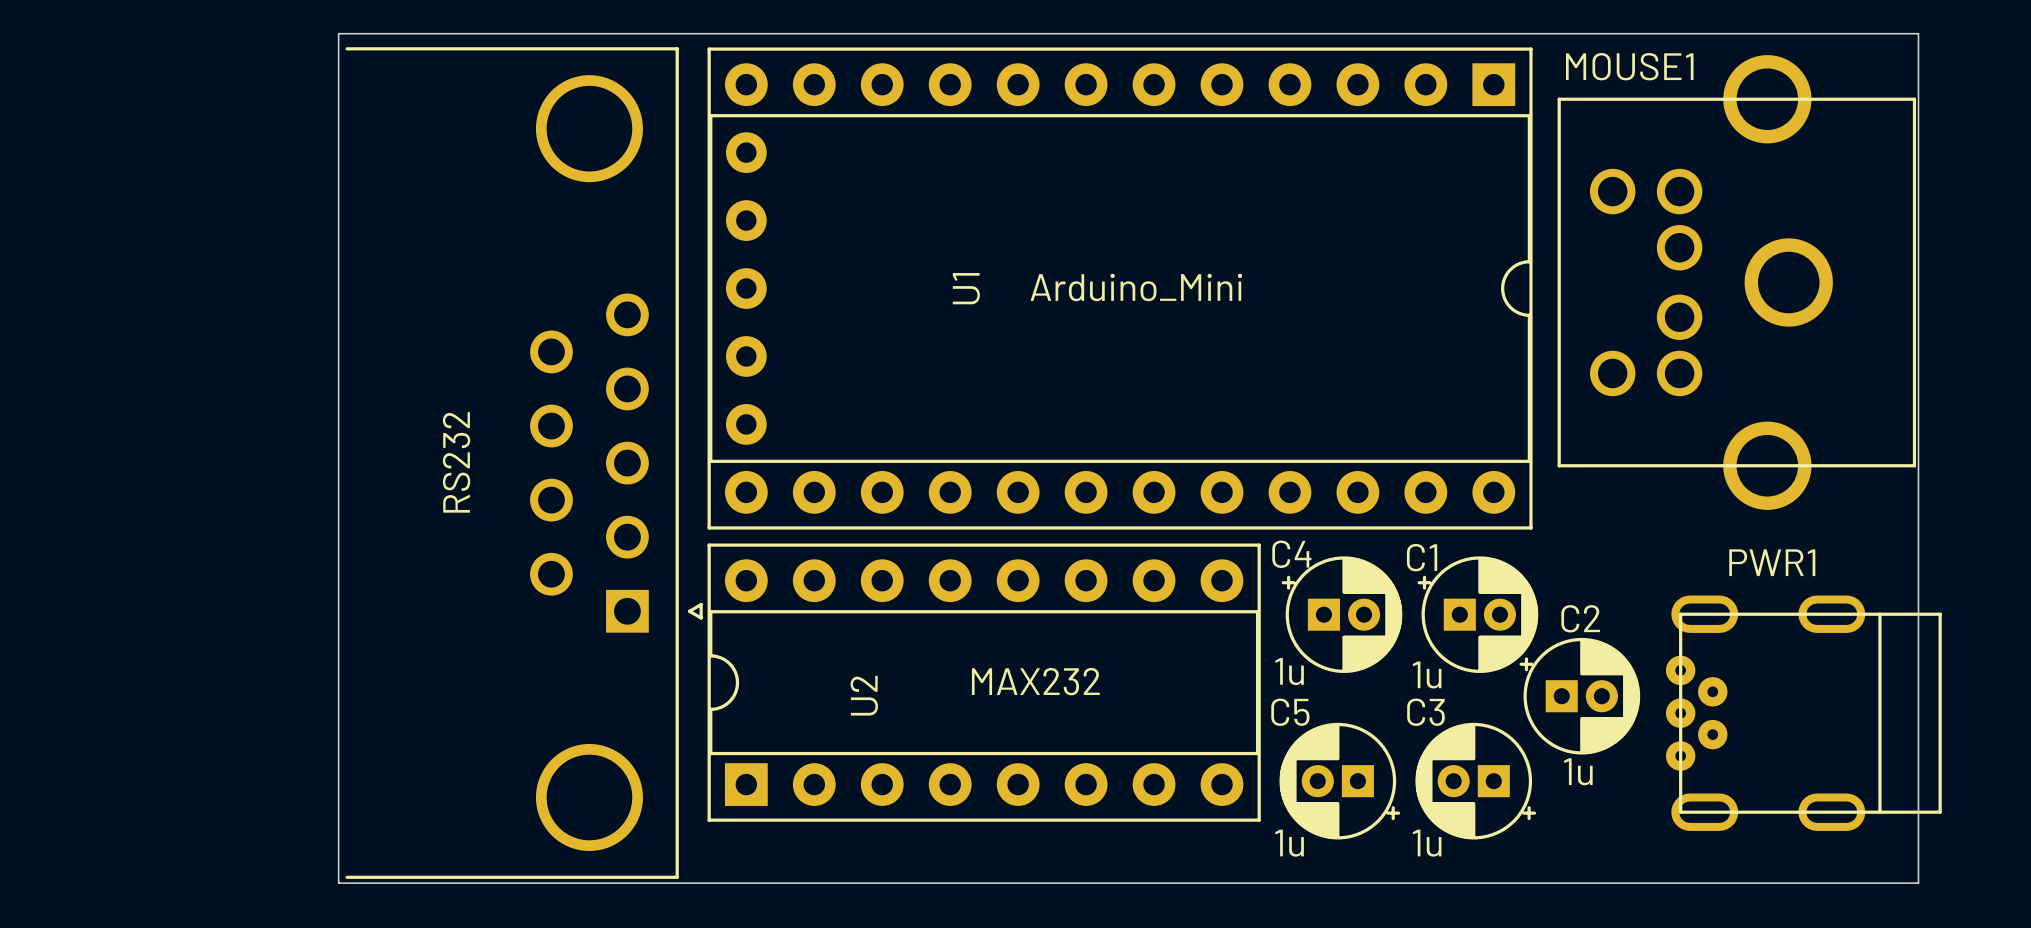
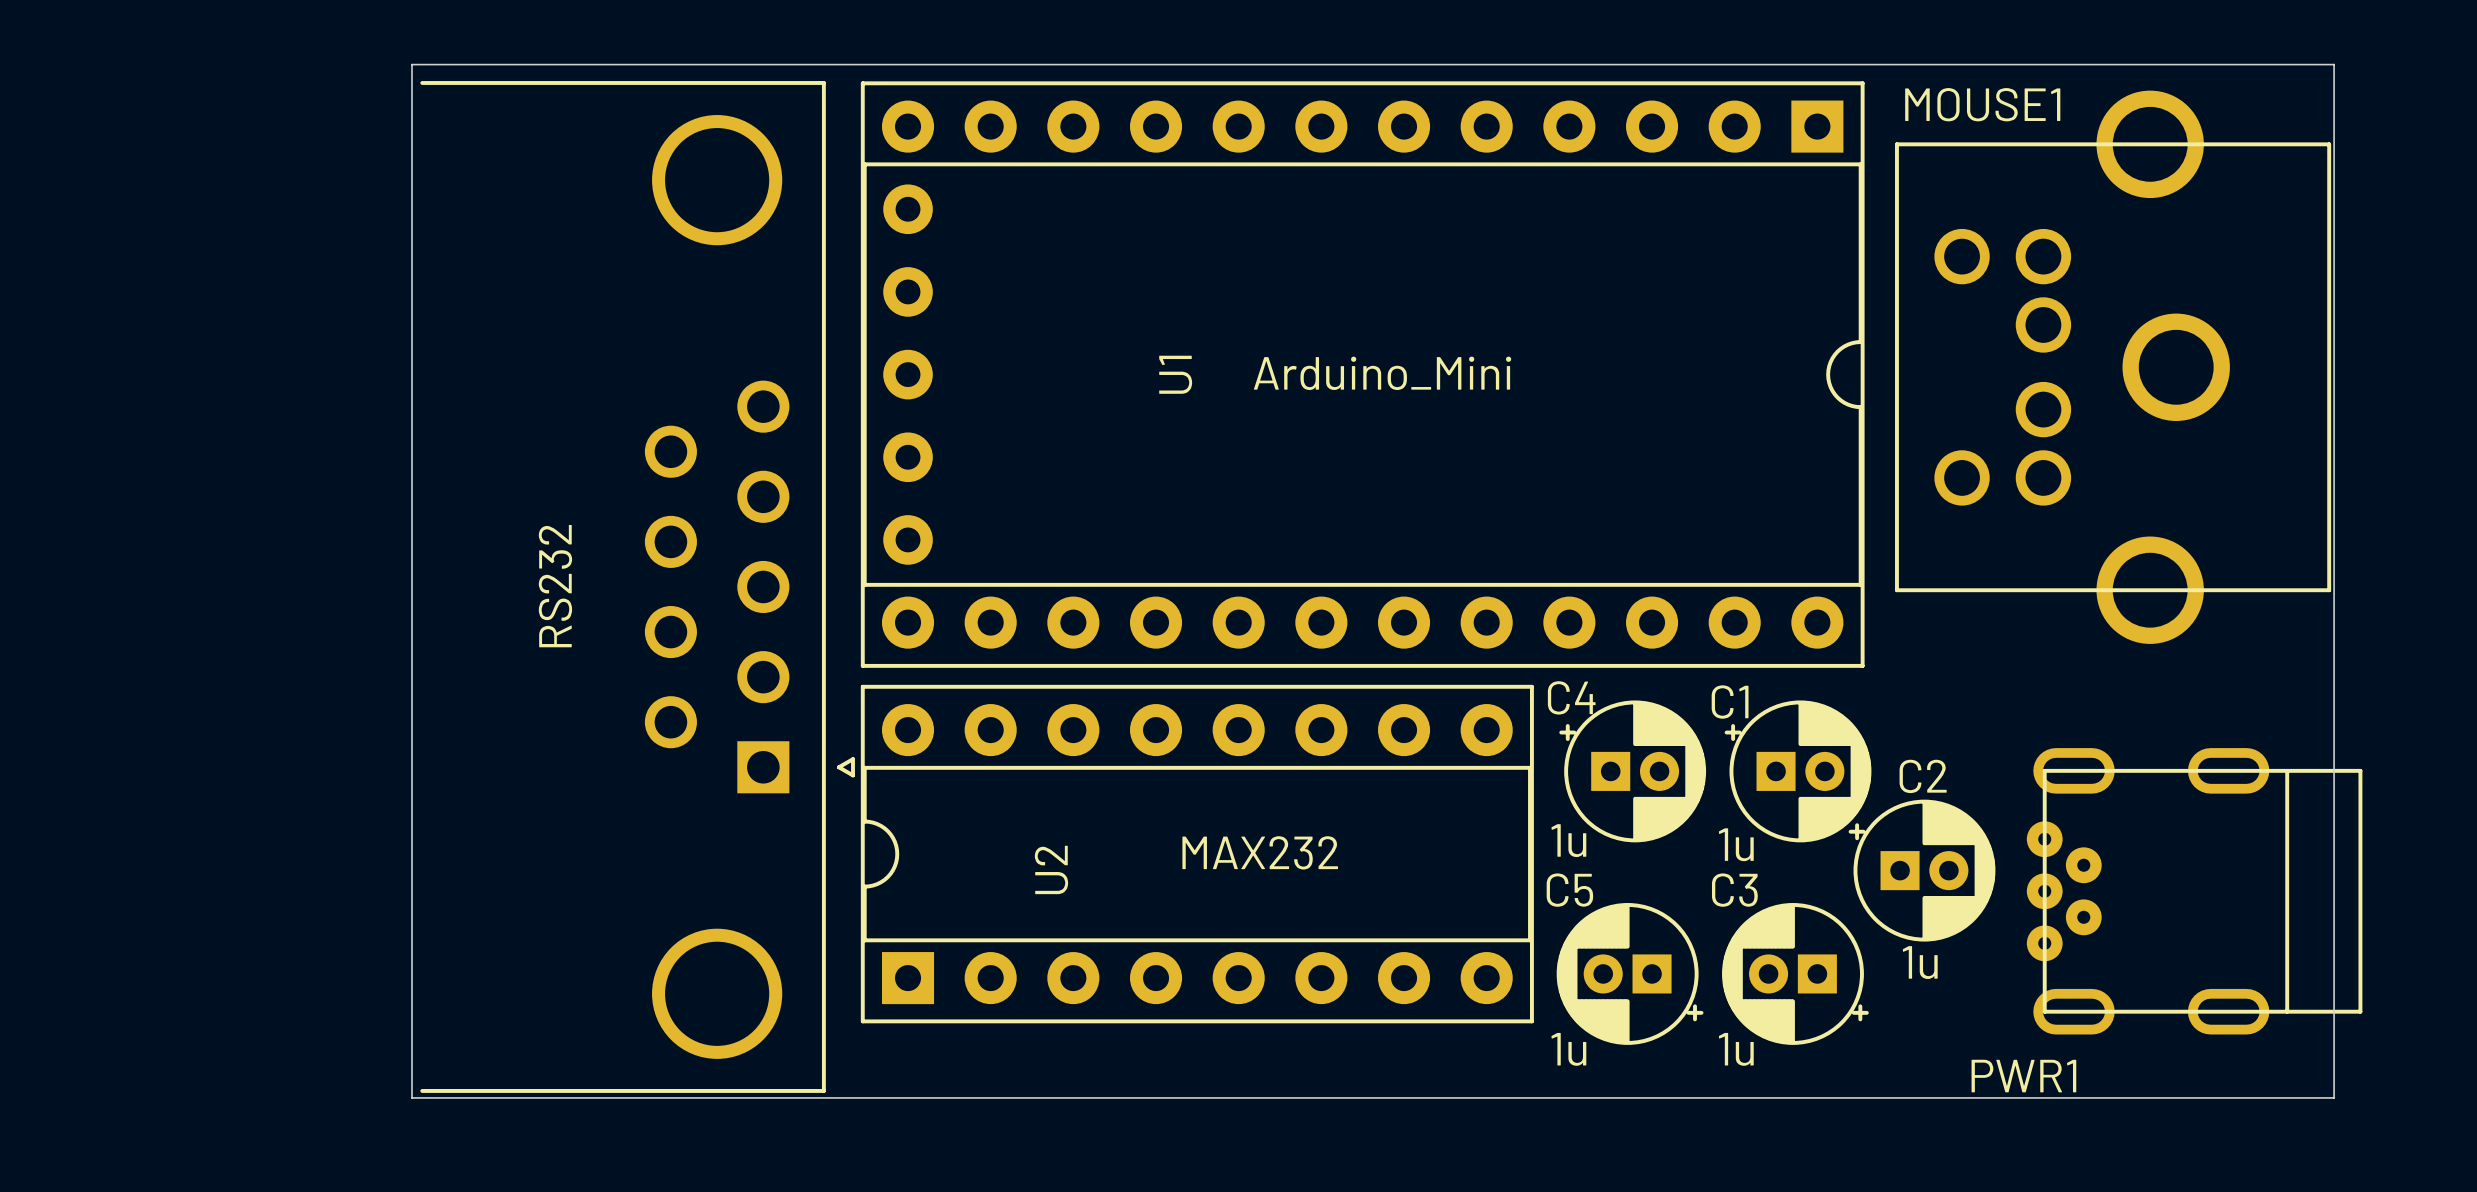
PWR1 name position: PWR1 (1772, 562) -> PWR1 (2023, 1076)

